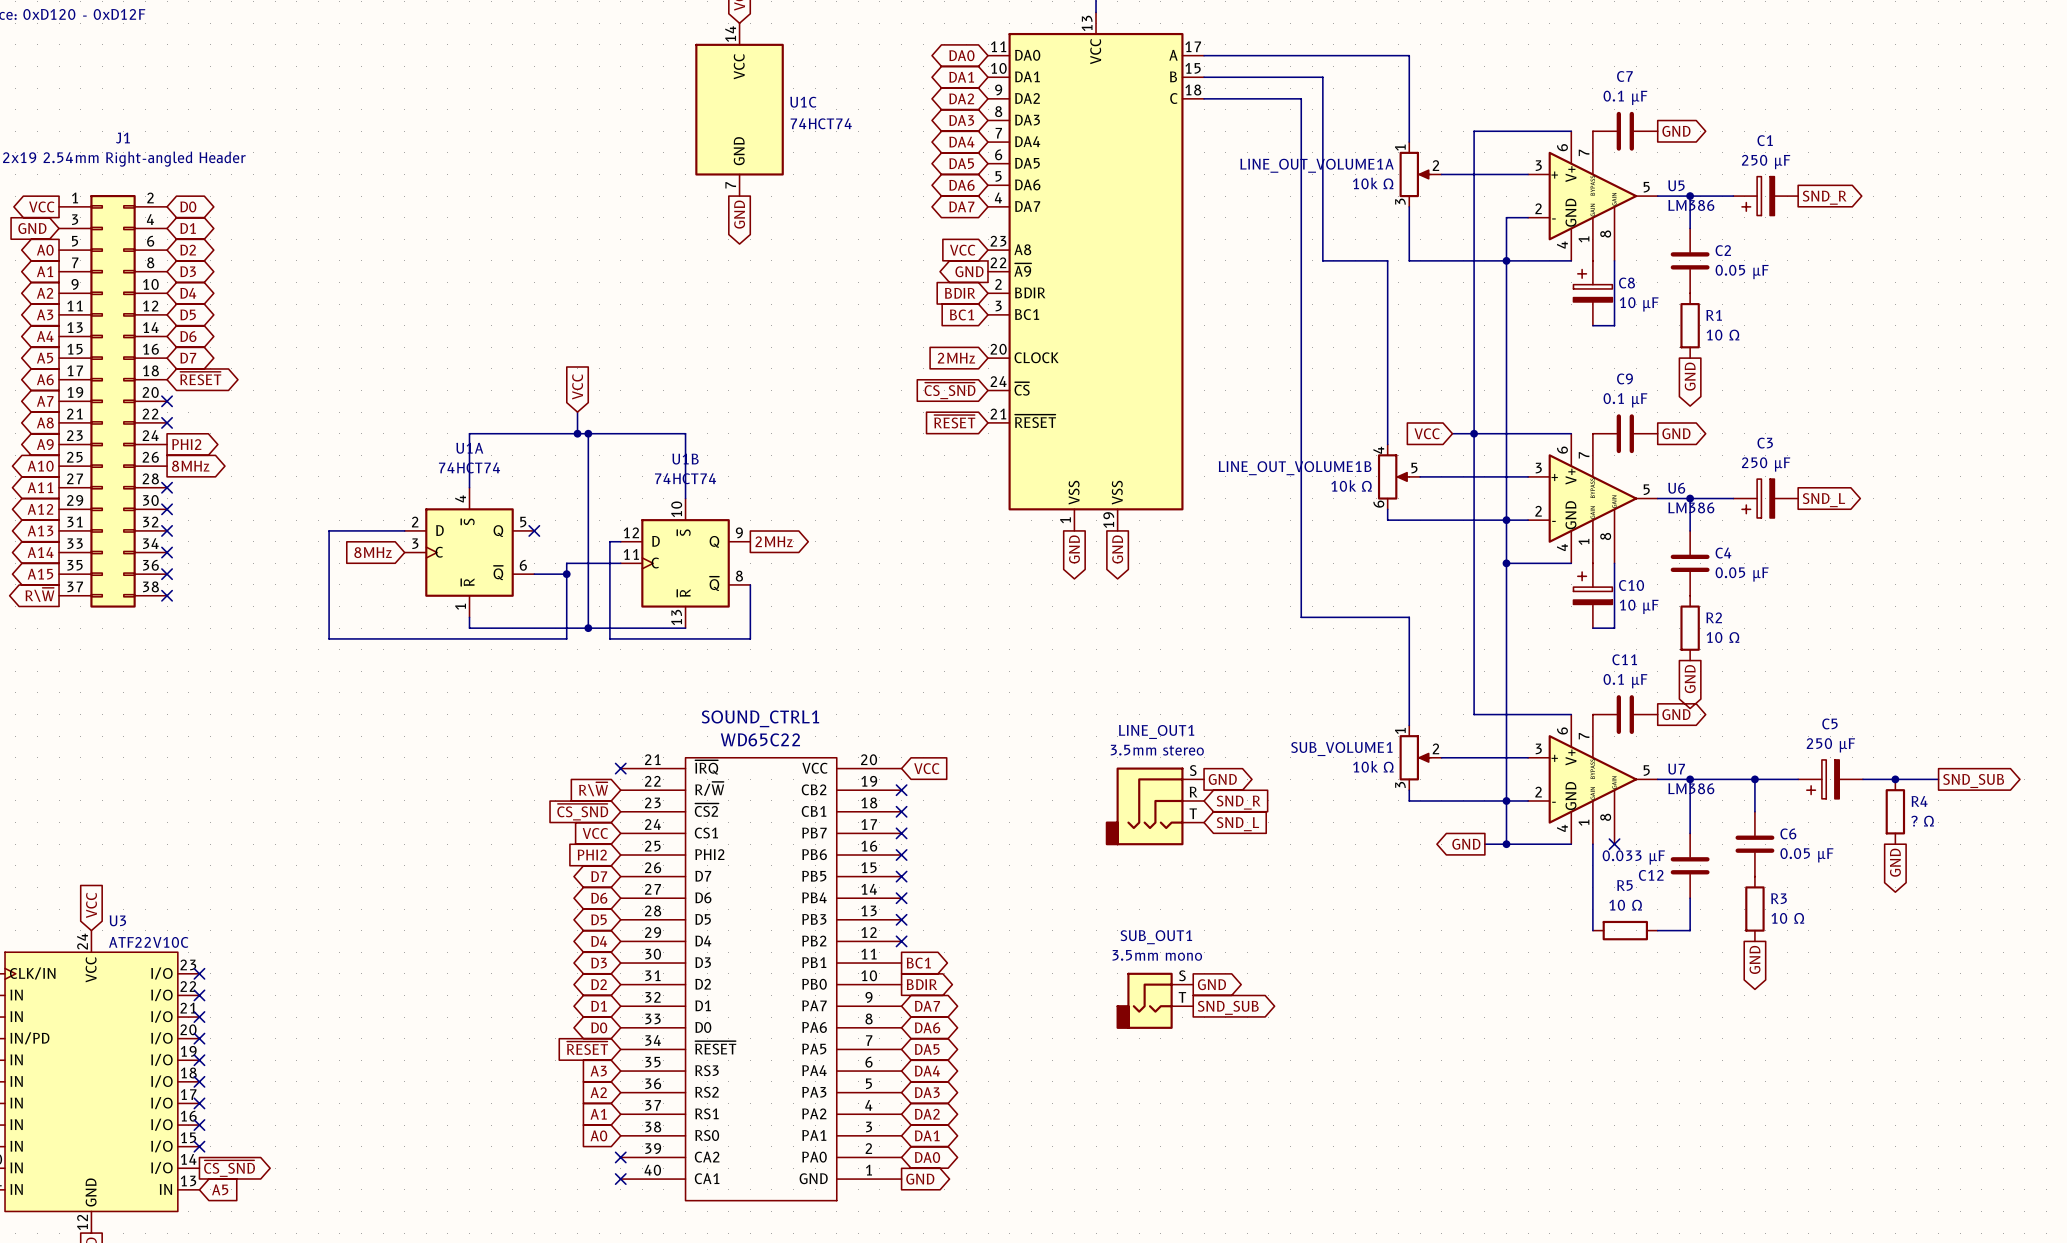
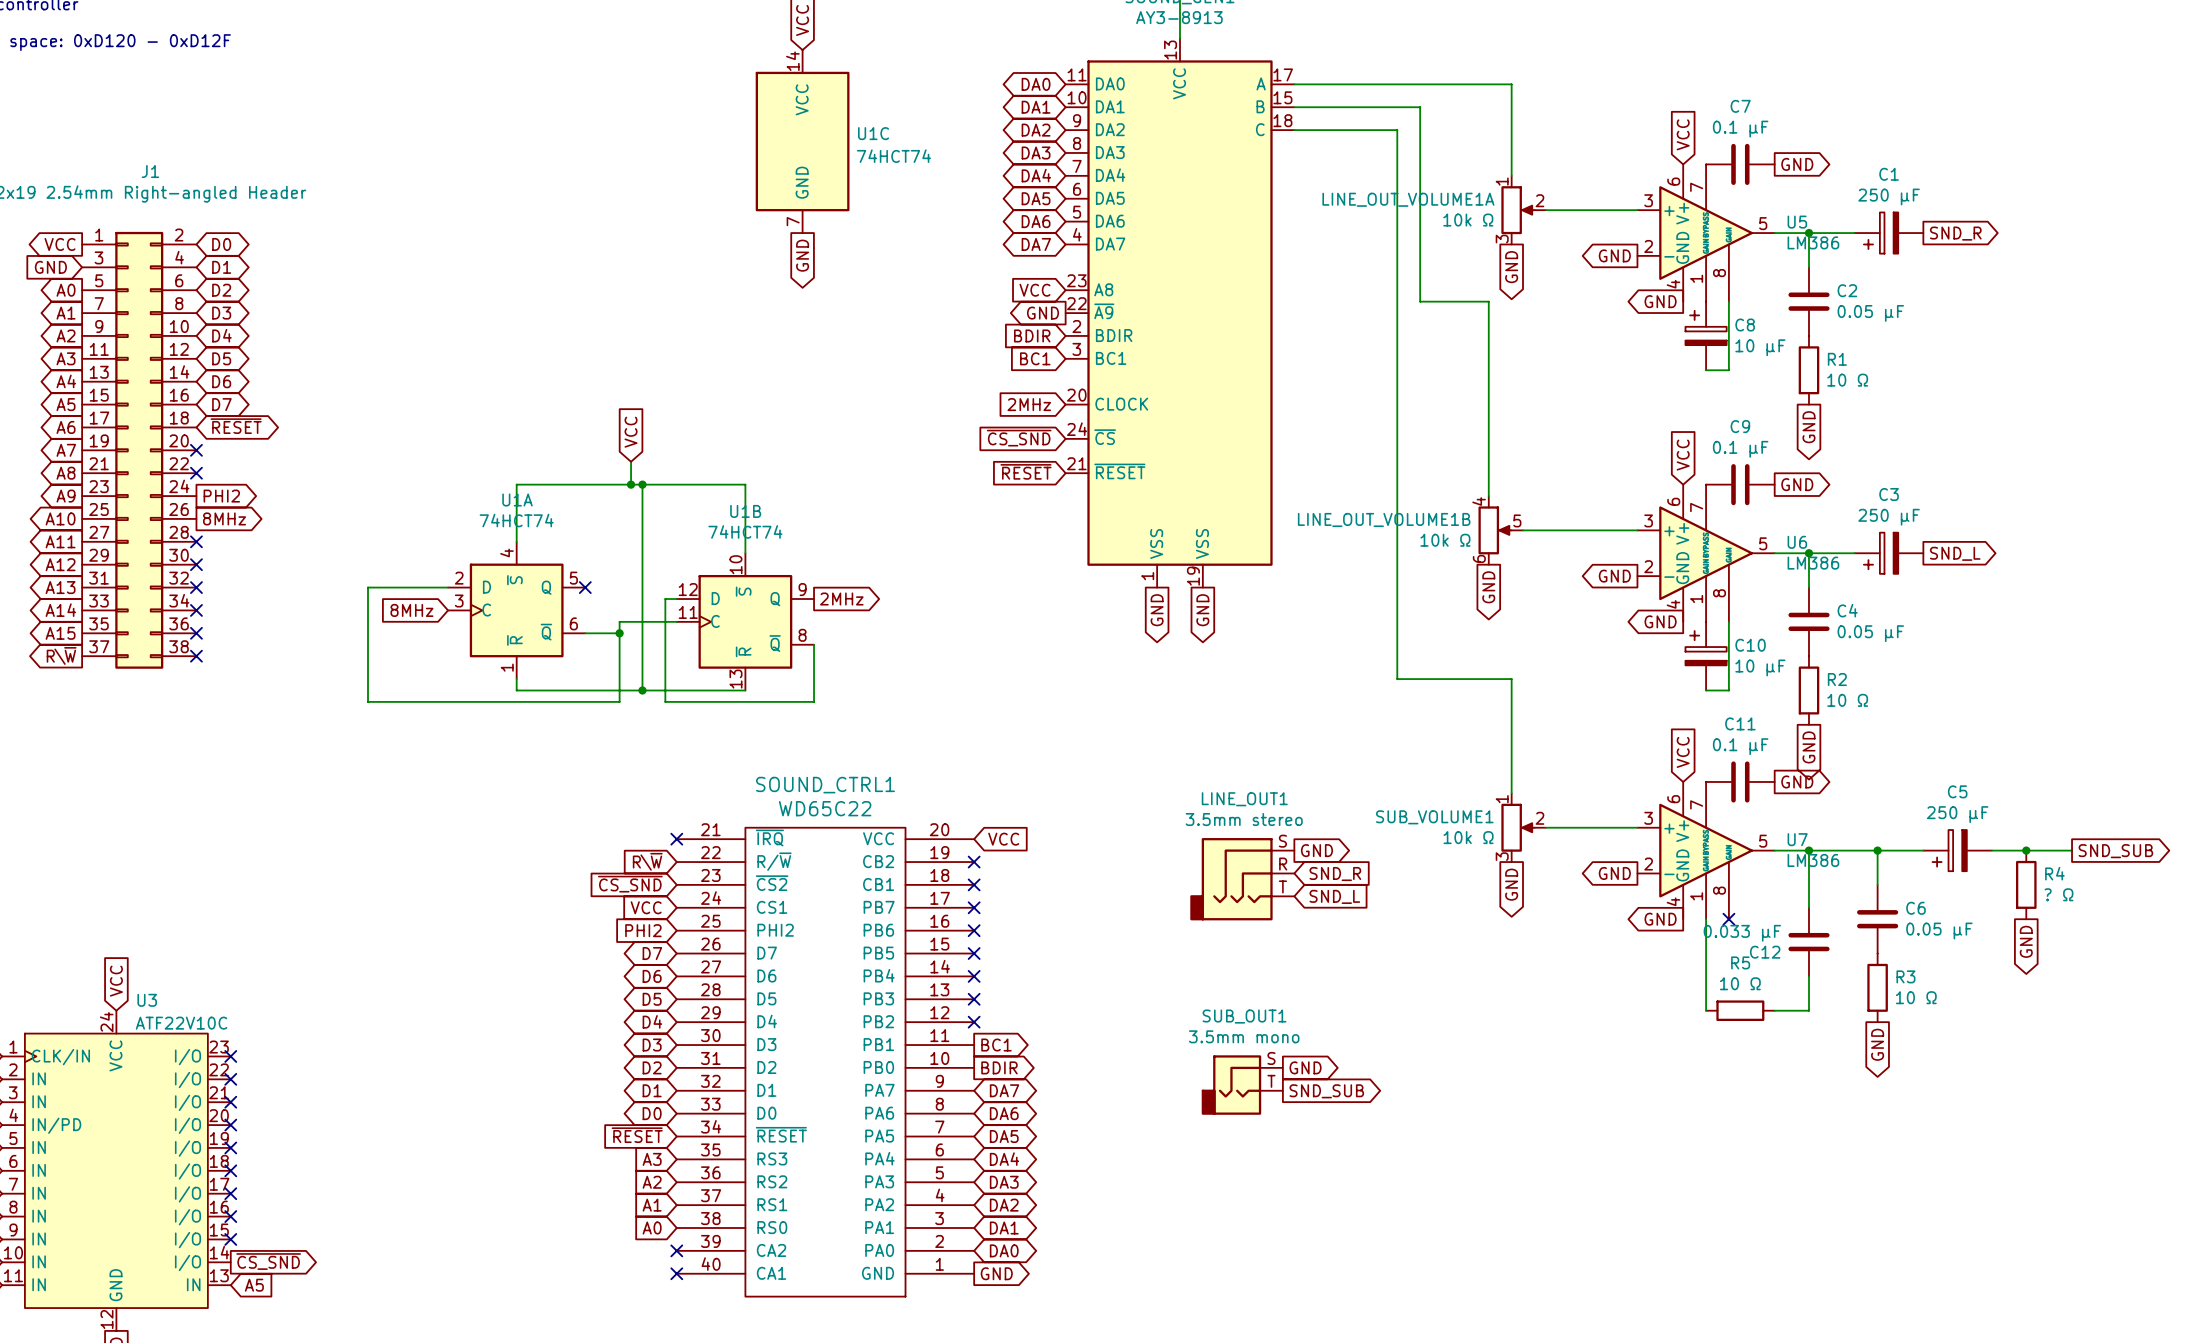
global label: none -> VCC (1683, 134)
wire: (1571, 131) (1474, 131) (1474, 714) (1571, 714) -> none
wire: (1409, 206) (1409, 260) (1571, 260) -> none
global label: none -> GND (1614, 255)
wire: (1528, 217) (1506, 217) (1506, 844) -> none
global label: none -> GND (1511, 267)
junction: (1506, 260) -> none
global label: none -> GND (1660, 301)
global label rotation: 0° (1427, 433) -> 90° clockwise (1683, 455)
global label position: VCC (1427, 433) -> VCC (1683, 455)
wire: (1452, 433) (1571, 433) -> none
junction: (1474, 433) -> none
wire: (1387, 509) (1387, 520) (1528, 520) -> none
junction: (1506, 520) -> none
global label: none -> GND (1614, 576)
global label: none -> GND (1488, 587)
wire: (1506, 563) (1571, 563) -> none
junction: (1506, 563) -> none
global label: none -> GND (1660, 621)
global label: none -> VCC (1683, 752)
wire: (1409, 790) (1409, 800) (1528, 800) -> none
junction: (1506, 800) -> none
global label: none -> GND (1614, 873)
global label rotation: 0° (1466, 844) -> 90° counterclockwise (1511, 884)
wire: (1484, 844) (1571, 844) -> none
junction: (1506, 844) -> none
global label: none -> GND (1660, 919)

